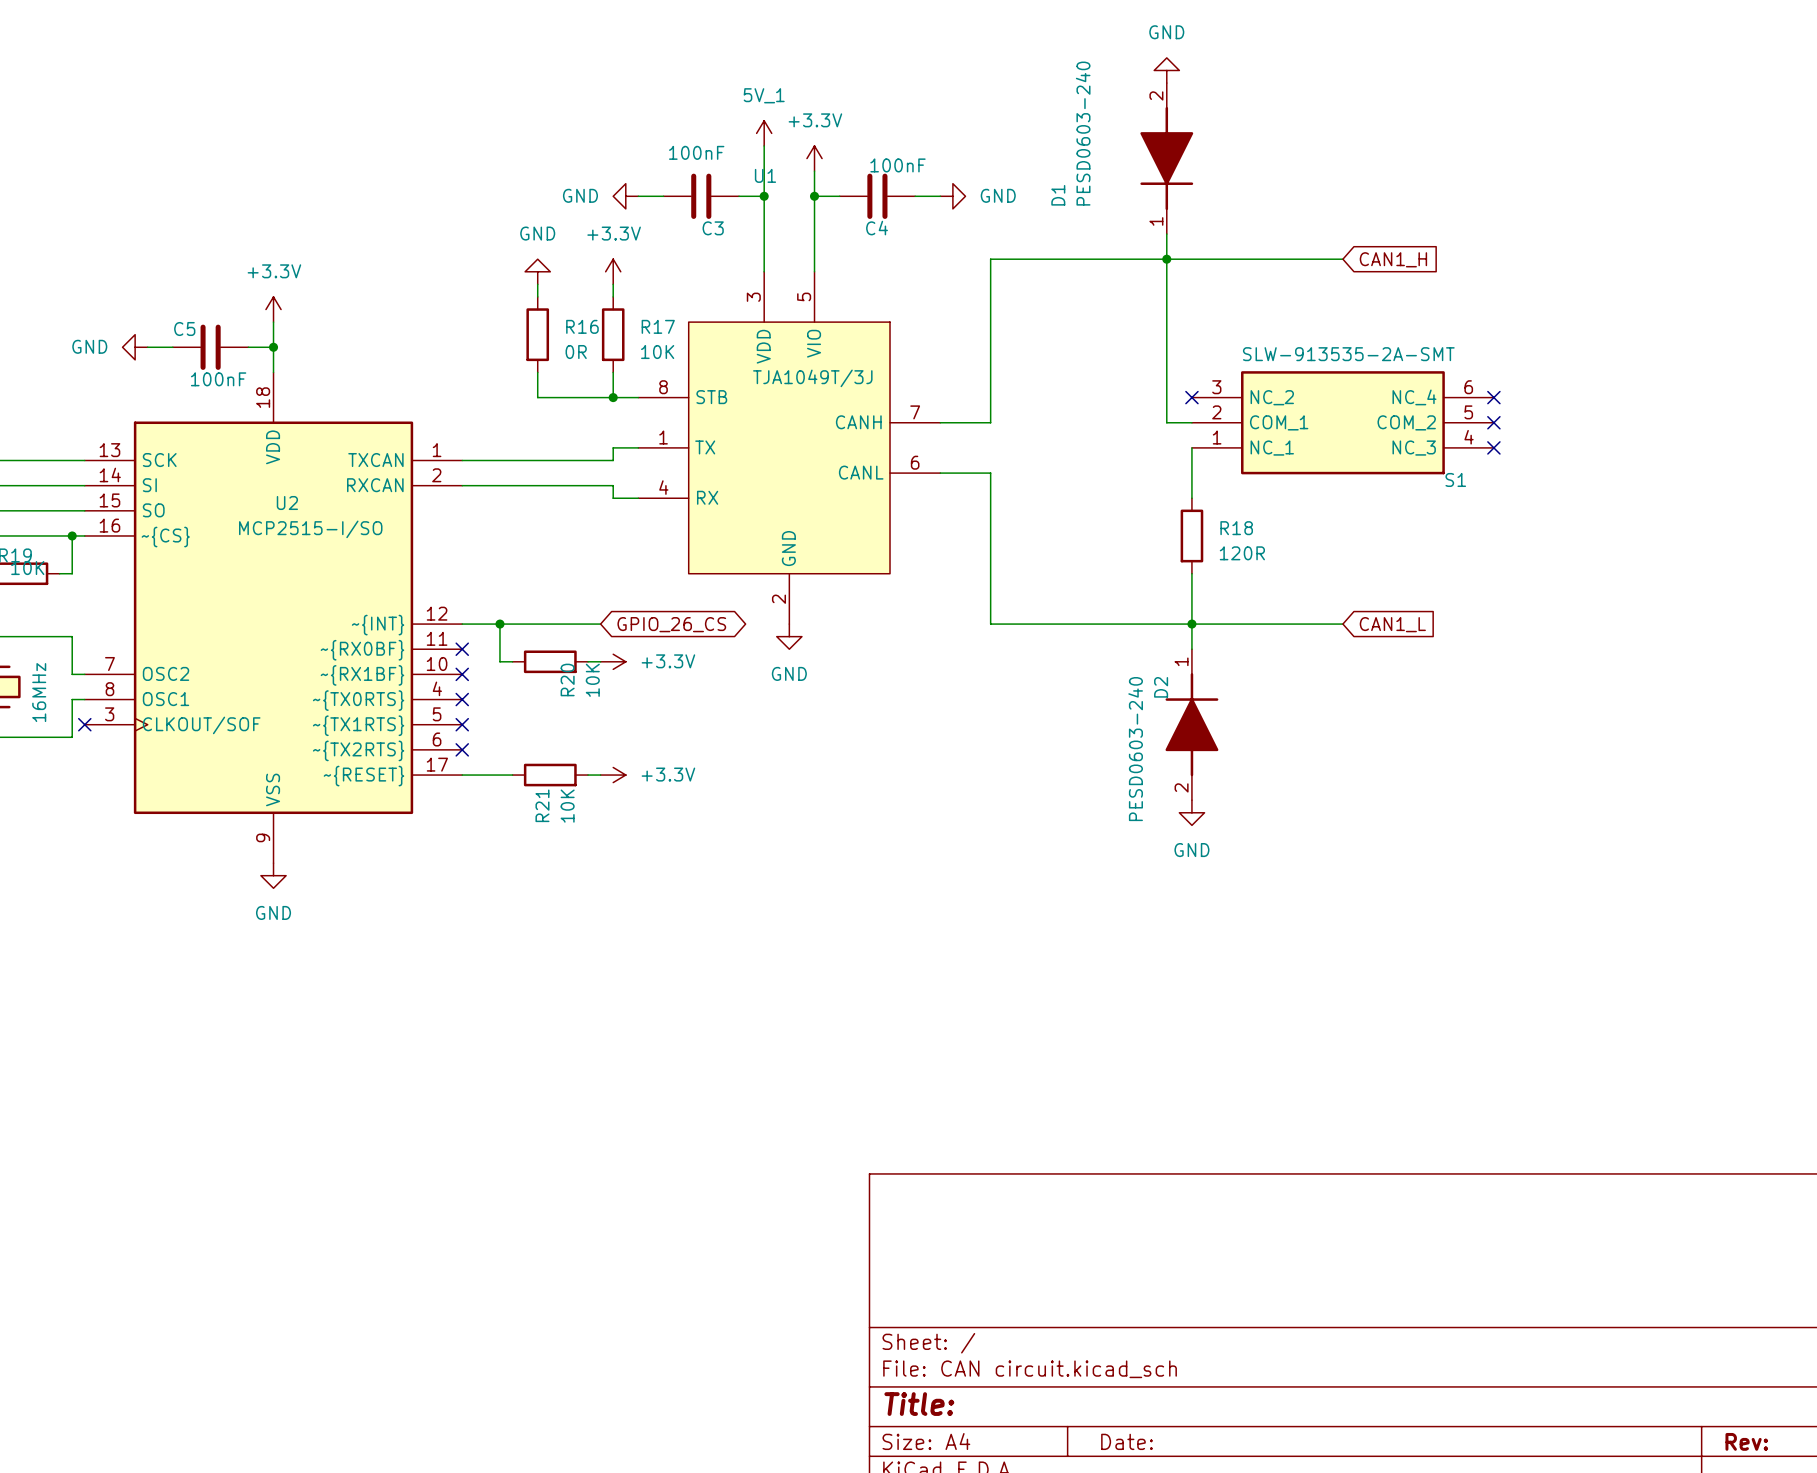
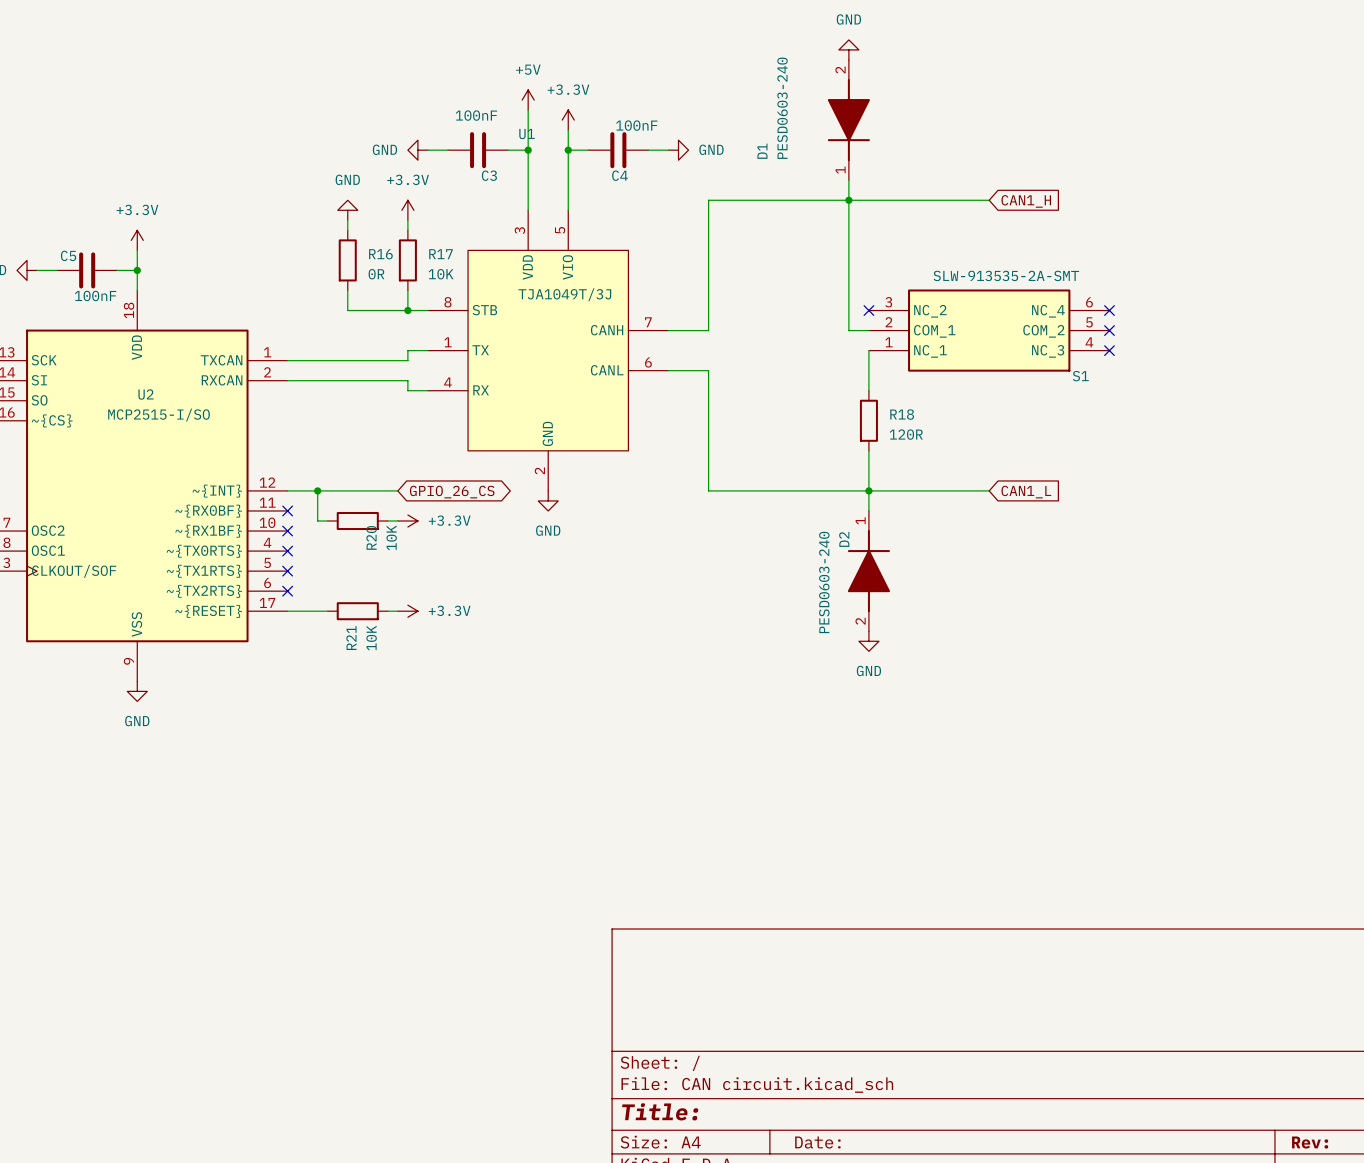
power symbol: 5V_1 (764, 133) -> +5V (528, 100)

